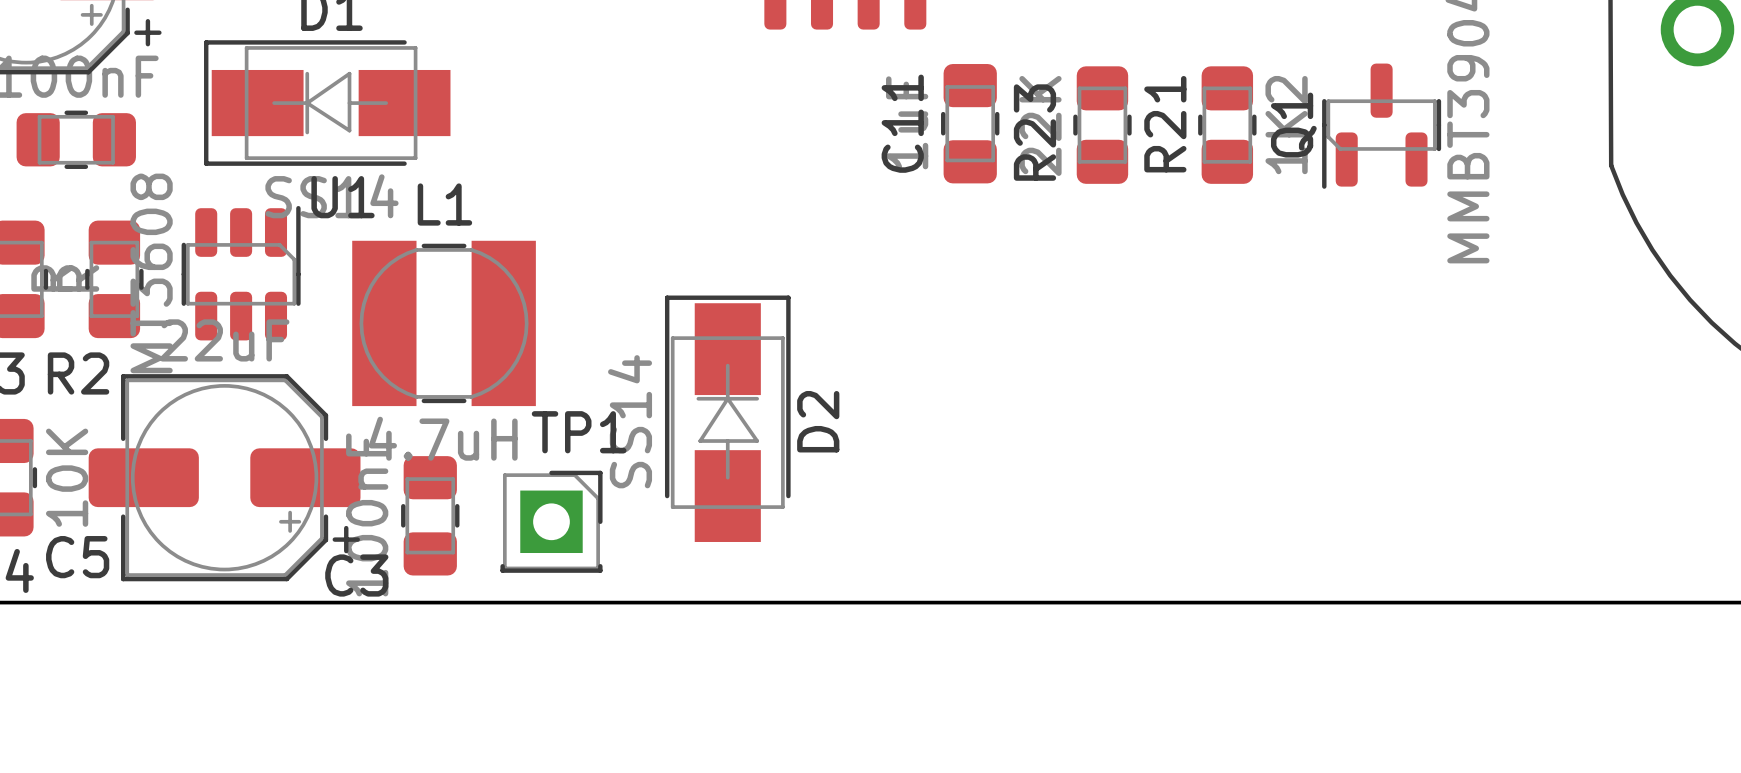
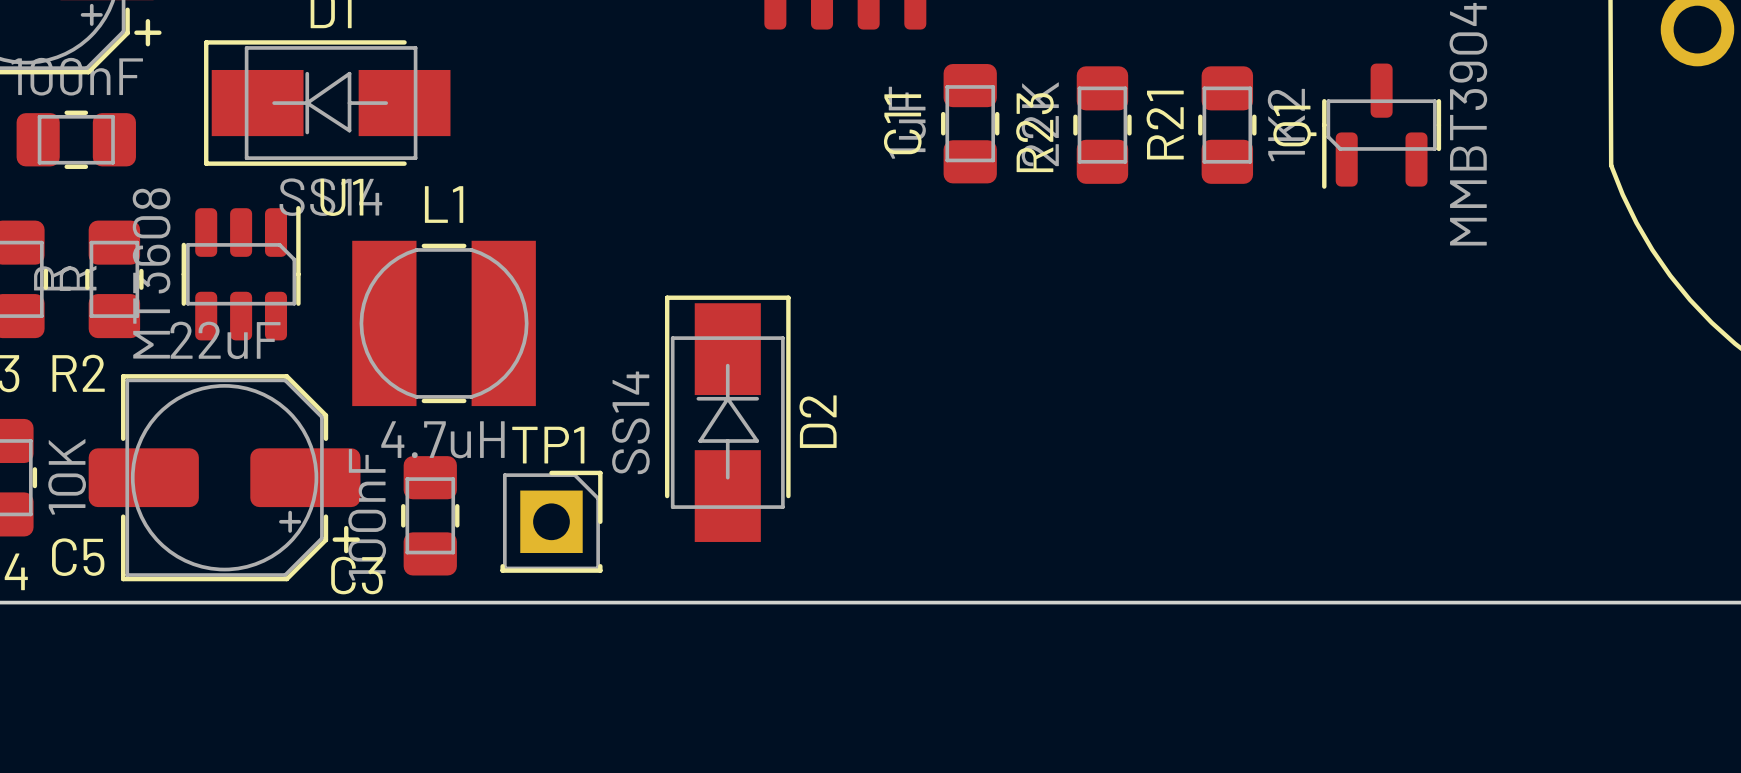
TP1 name position: TP1 (579, 432) -> TP1 (548, 445)

